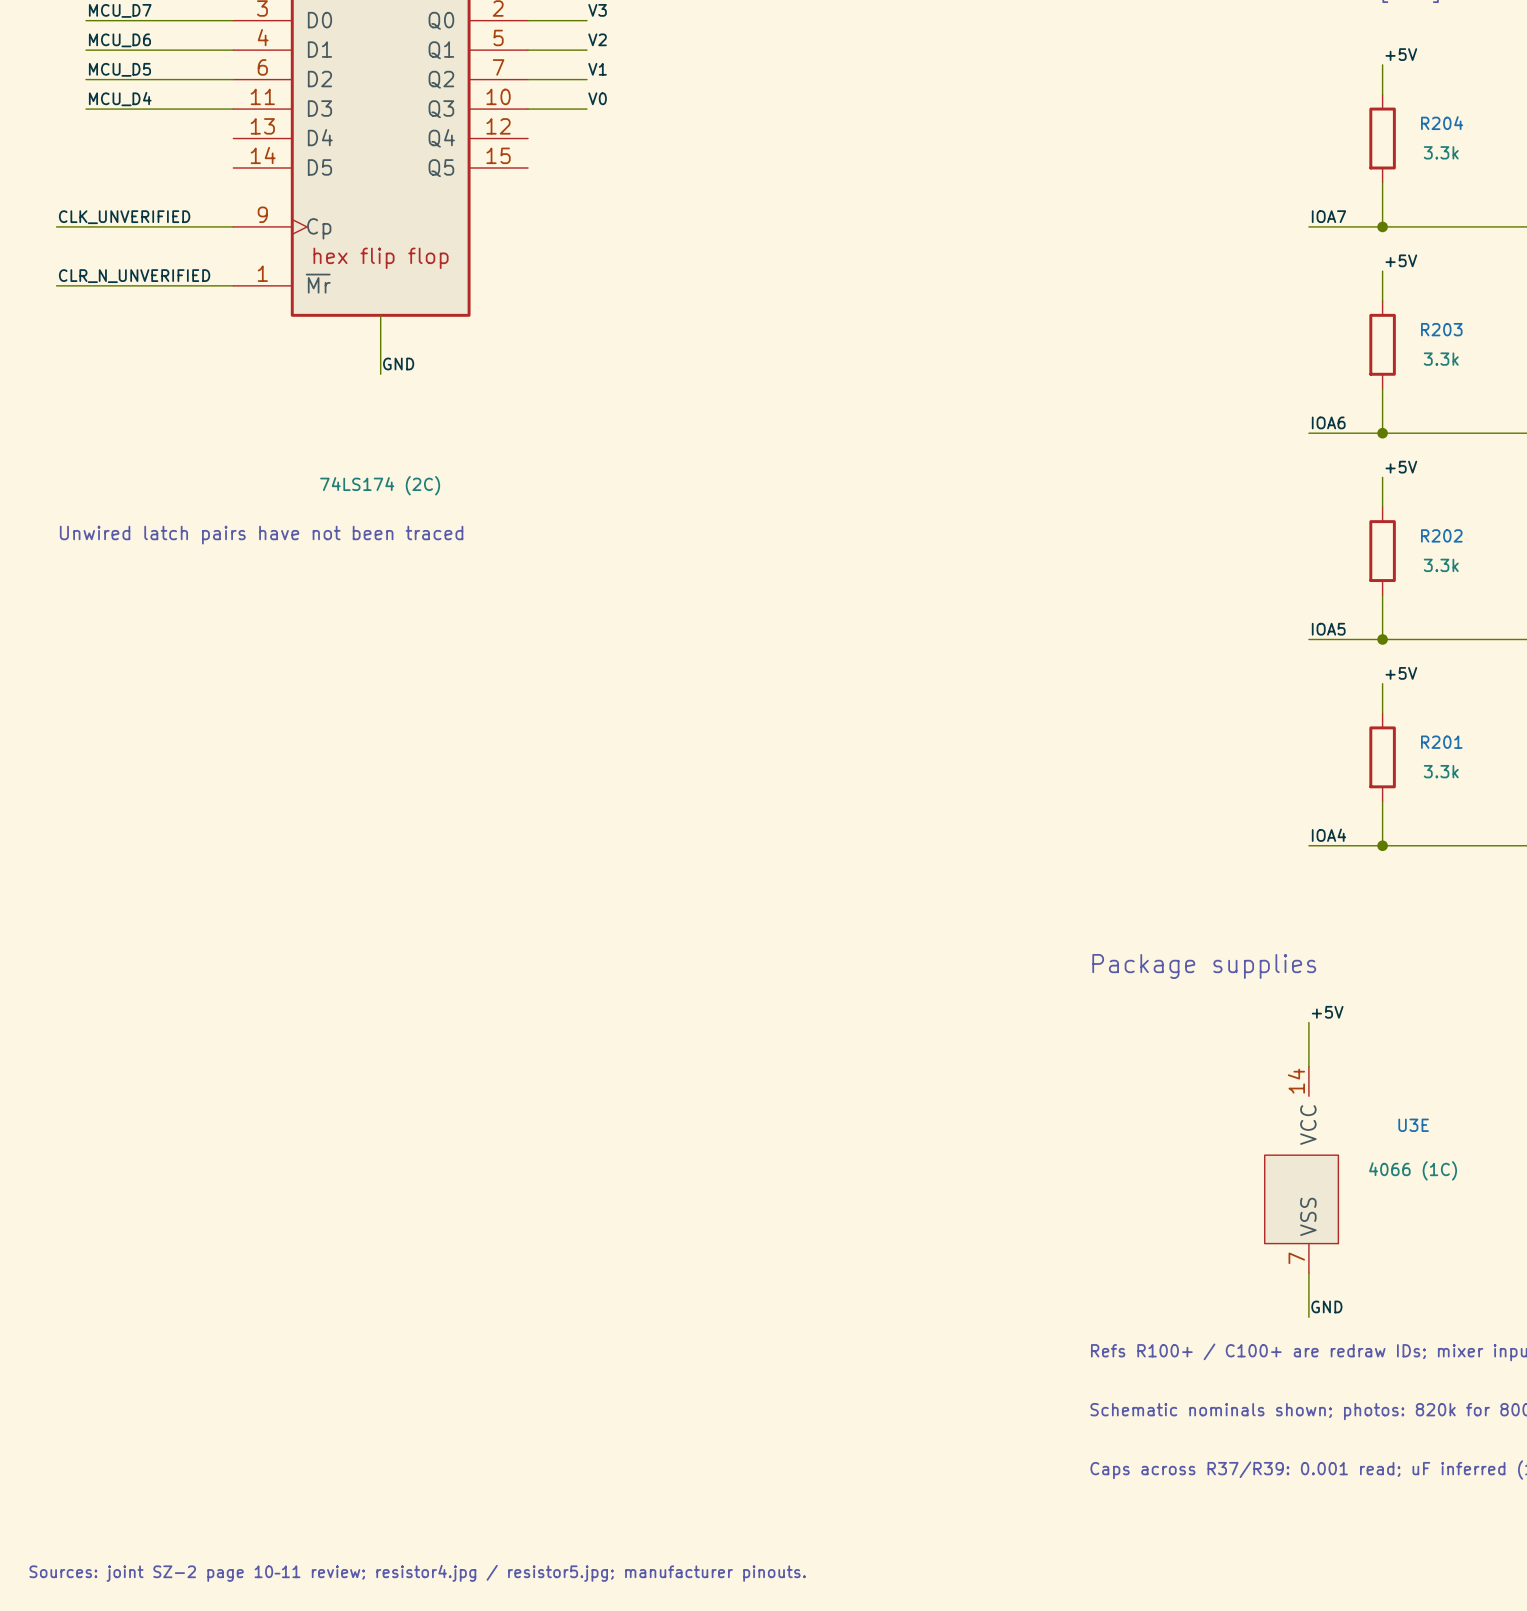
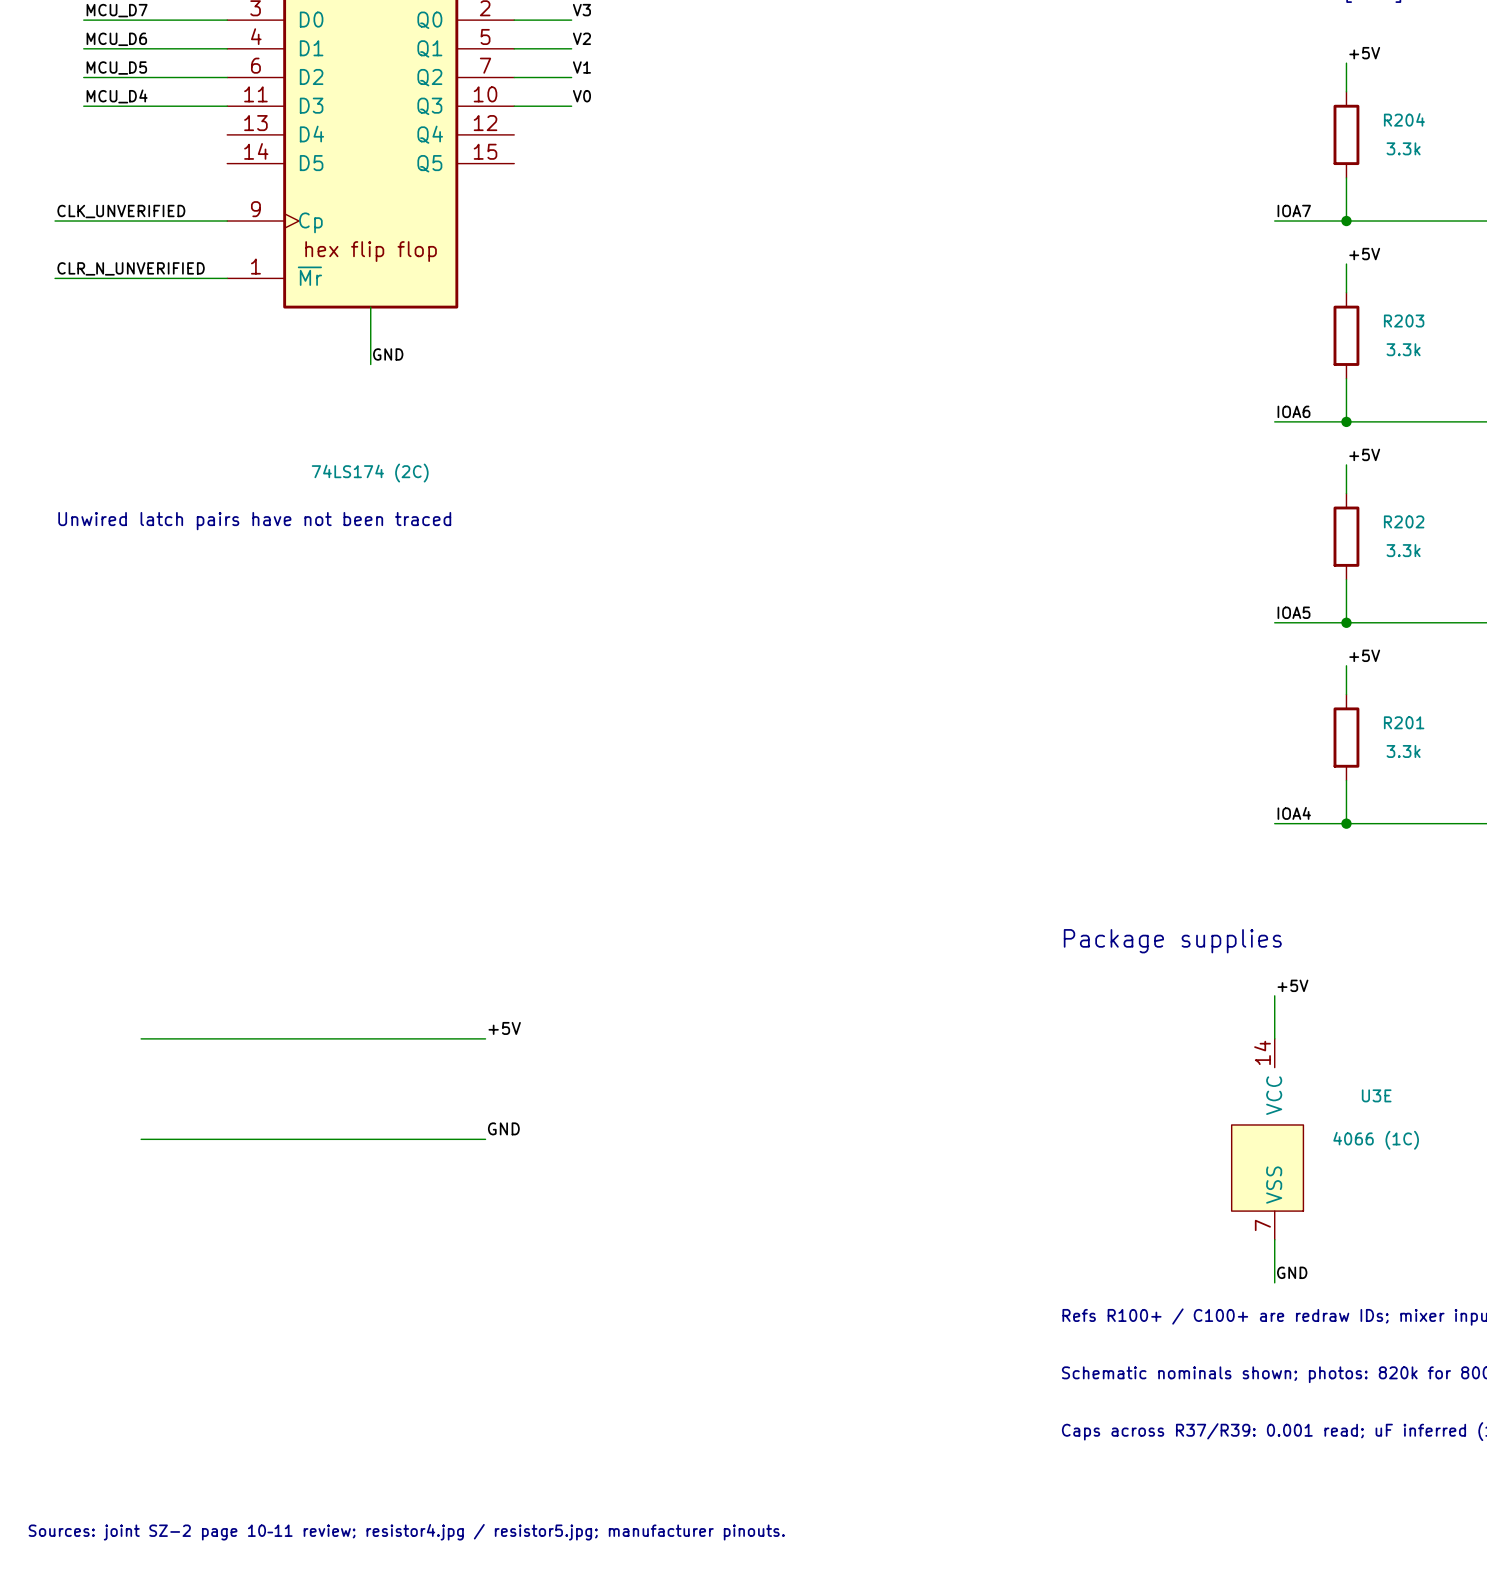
label: none -> +5V (504, 1028)
wire: none -> (141, 1038) (485, 1038)
label: none -> GND (503, 1128)
wire: none -> (141, 1139) (485, 1139)

